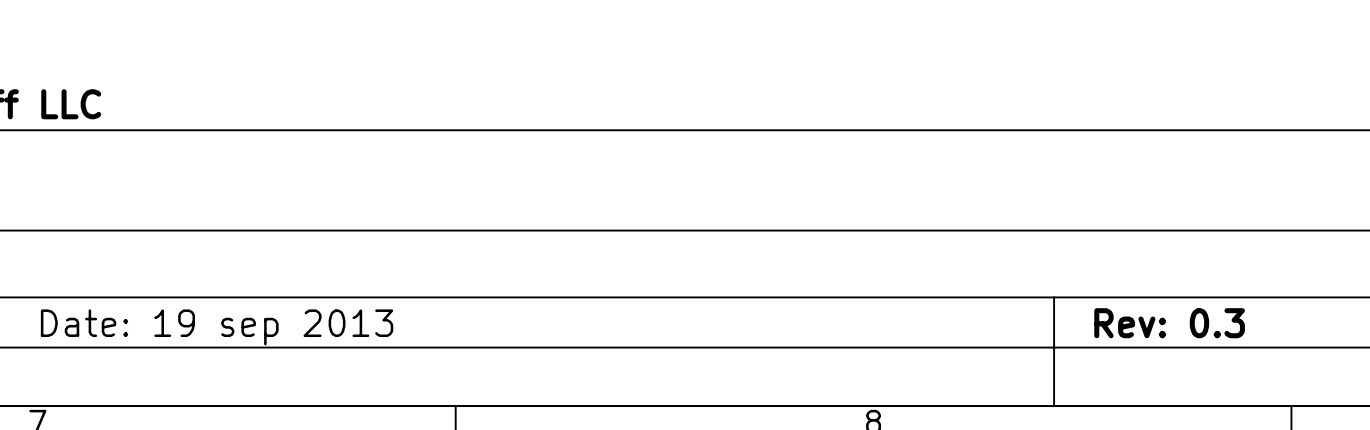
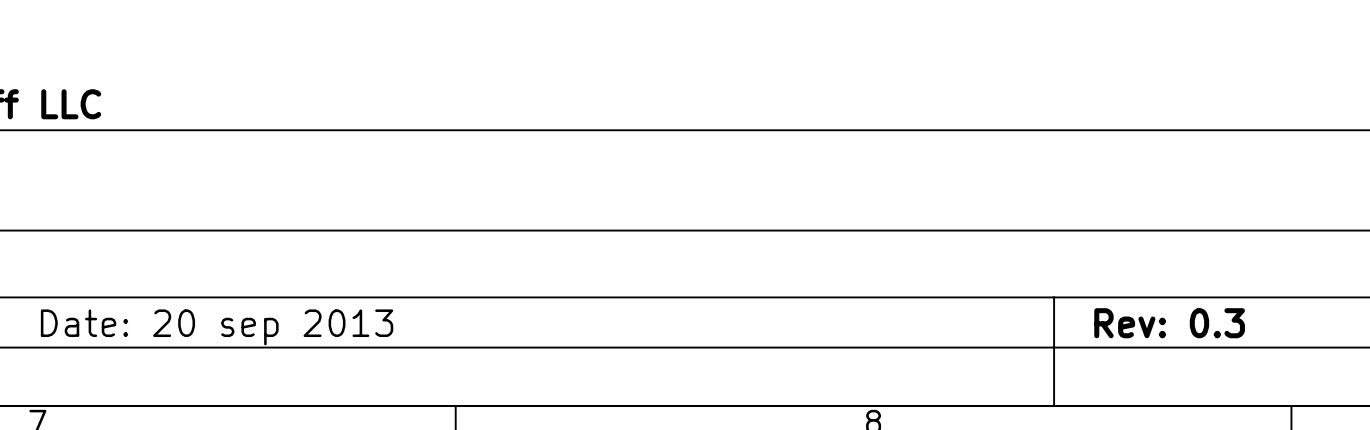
title block: Date: 19 sep 2013 (217, 327) -> Date: 20 sep 2013 (217, 327)

